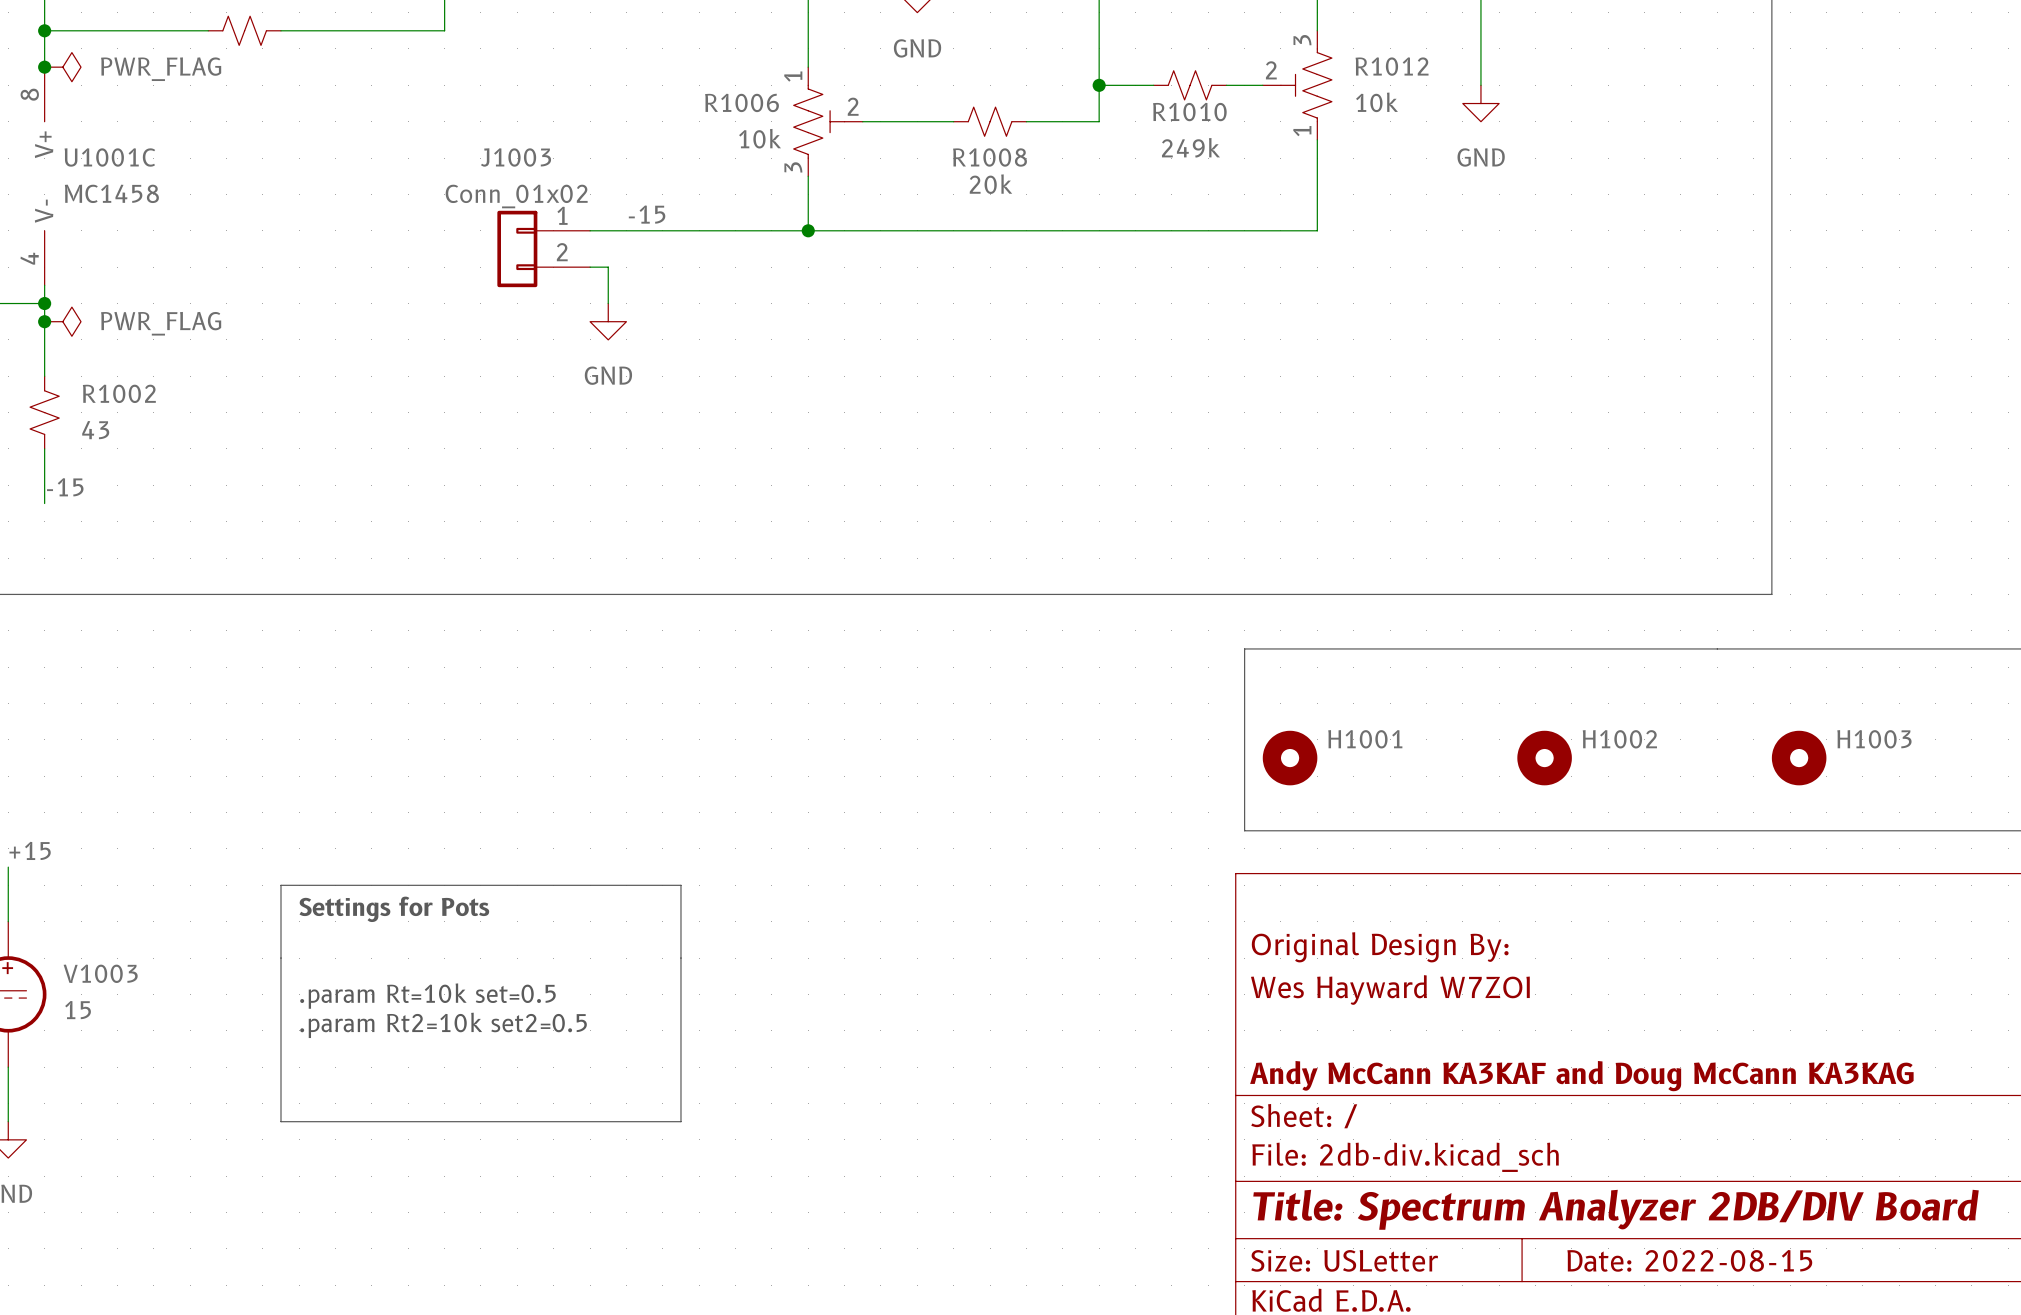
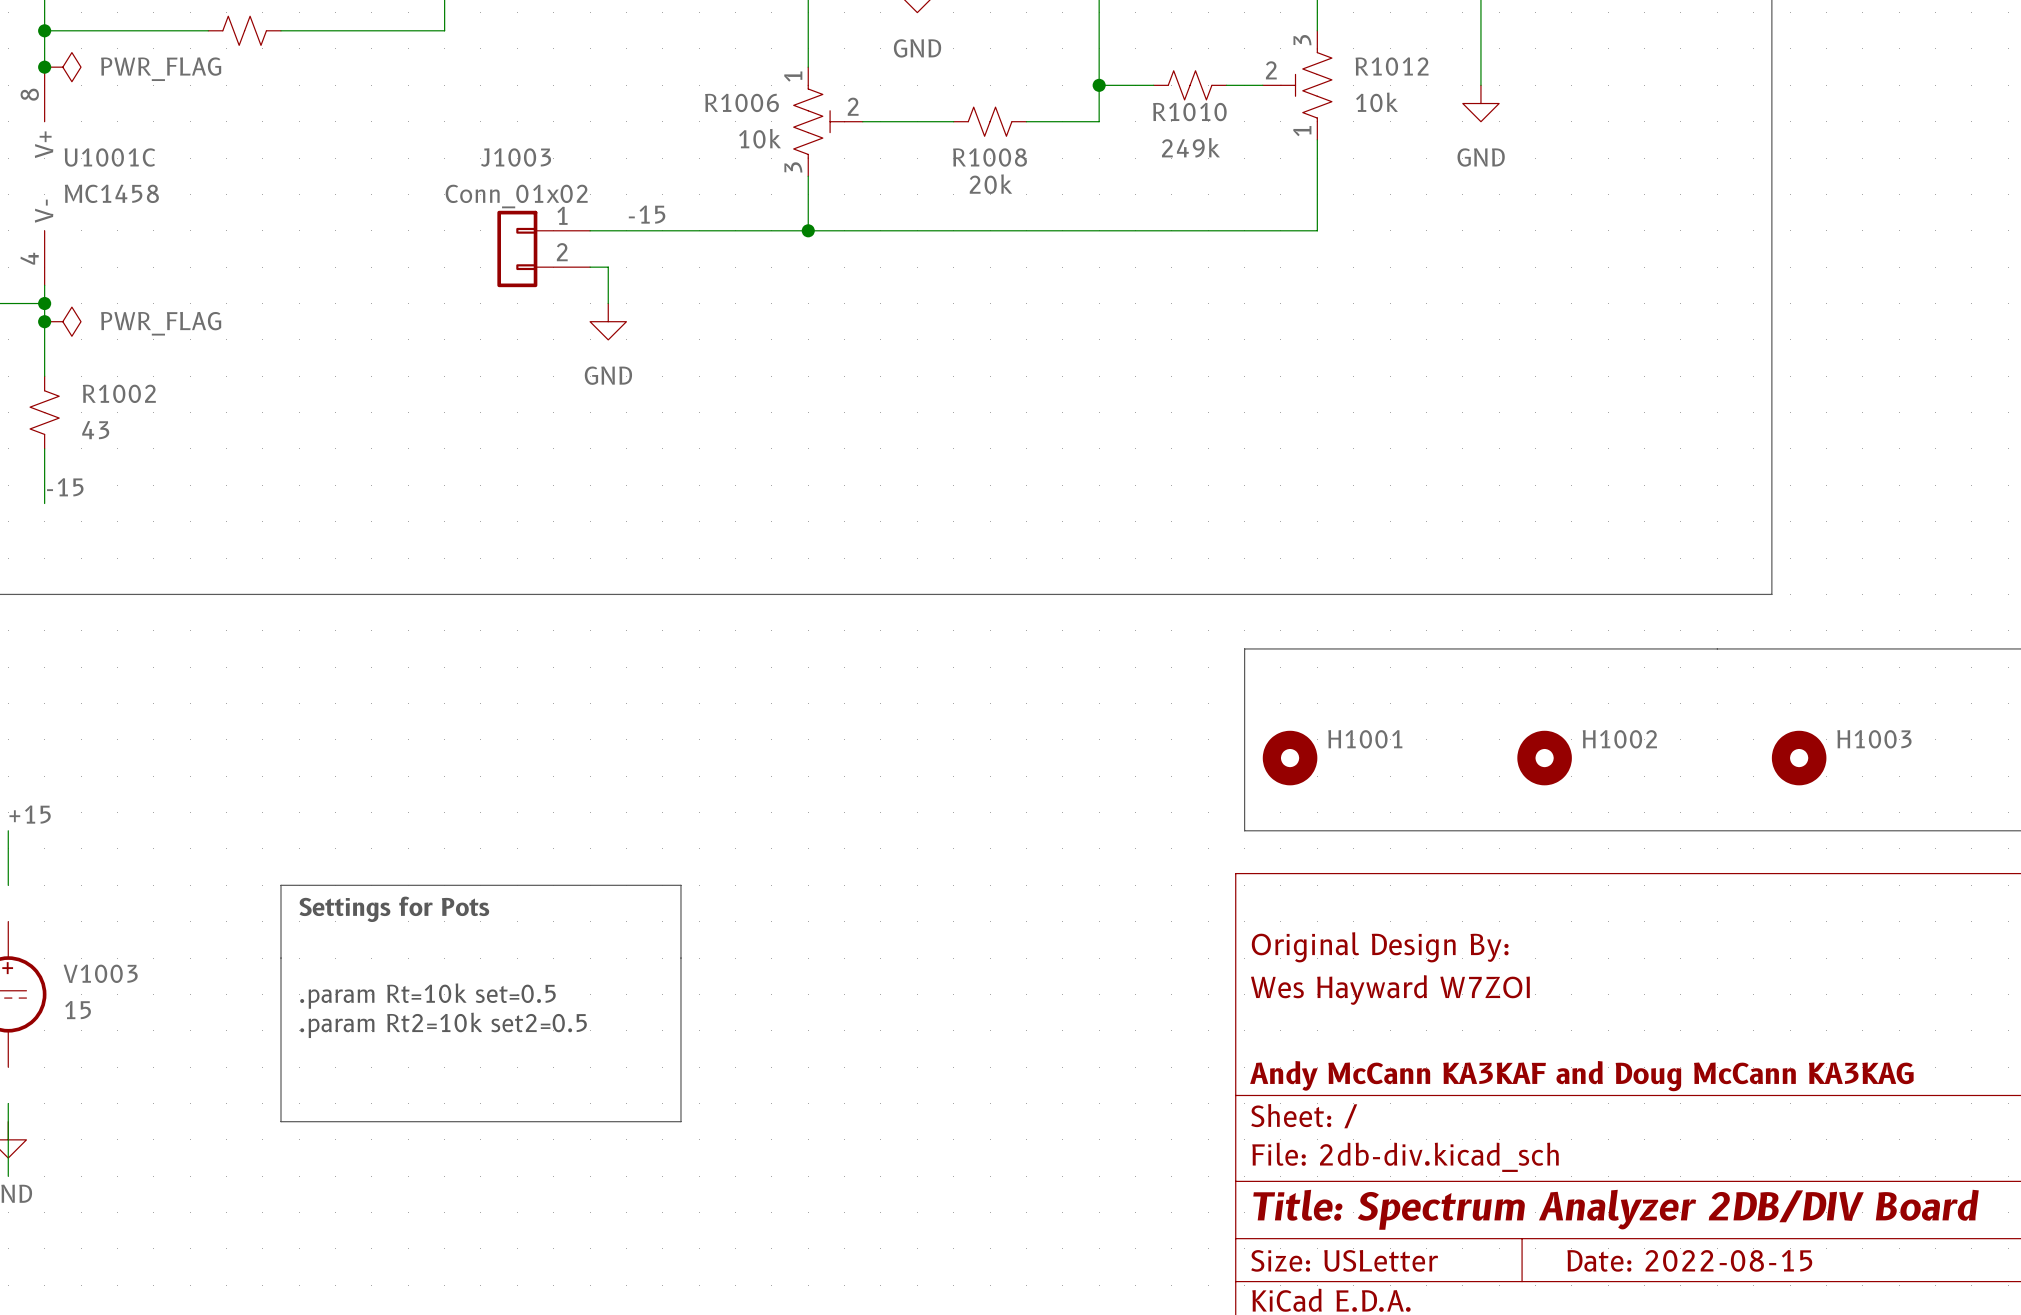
label position: +15 (30, 850) -> +15 (30, 814)
wire: (8, 885) (8, 921) -> (8, 830) (8, 867)
wire: (8, 1067) (8, 1103) -> none
wire: none -> (8, 1121) (8, 1176)

